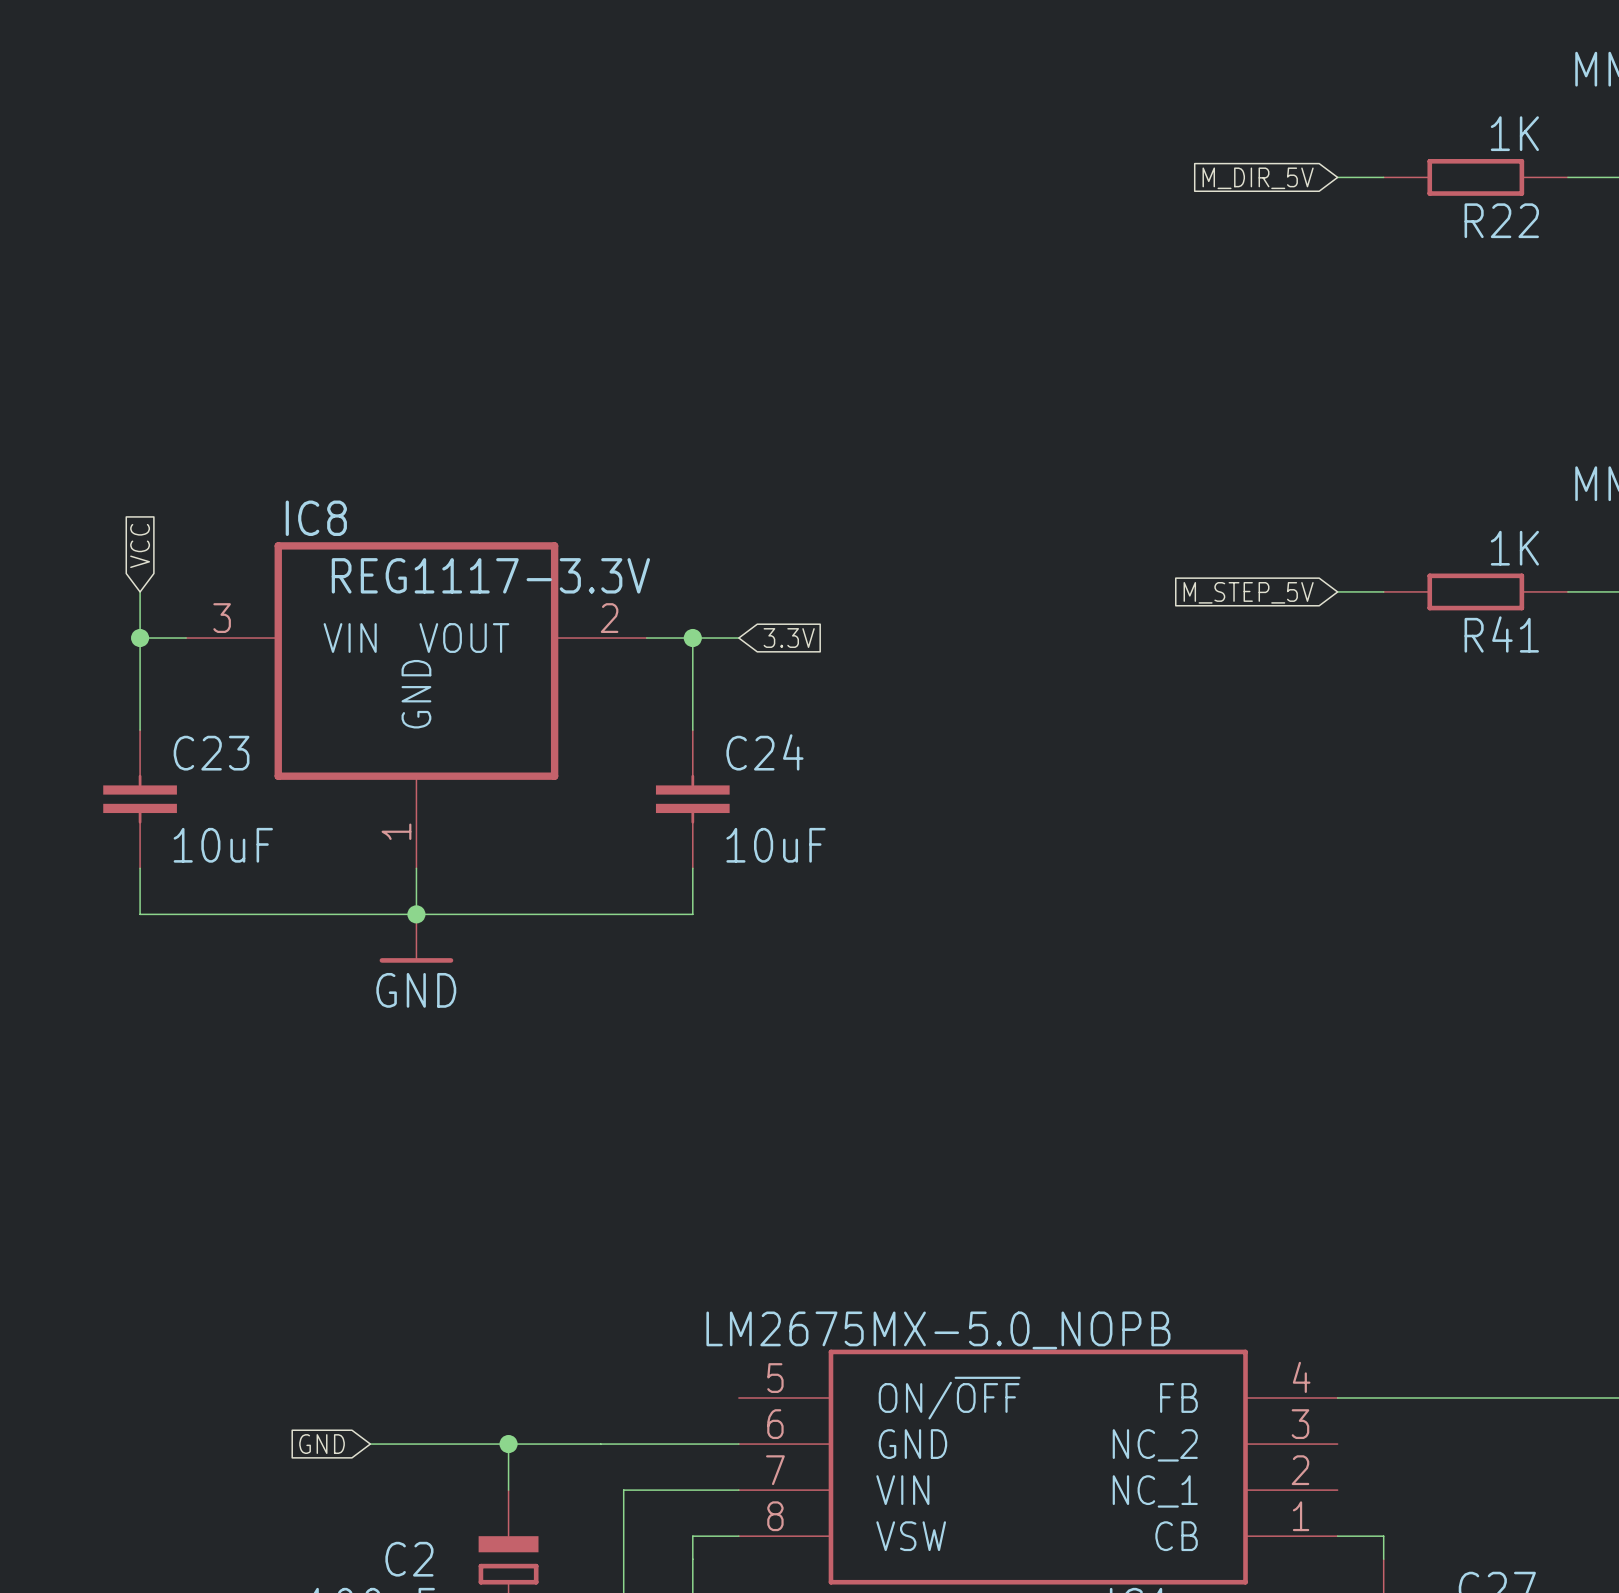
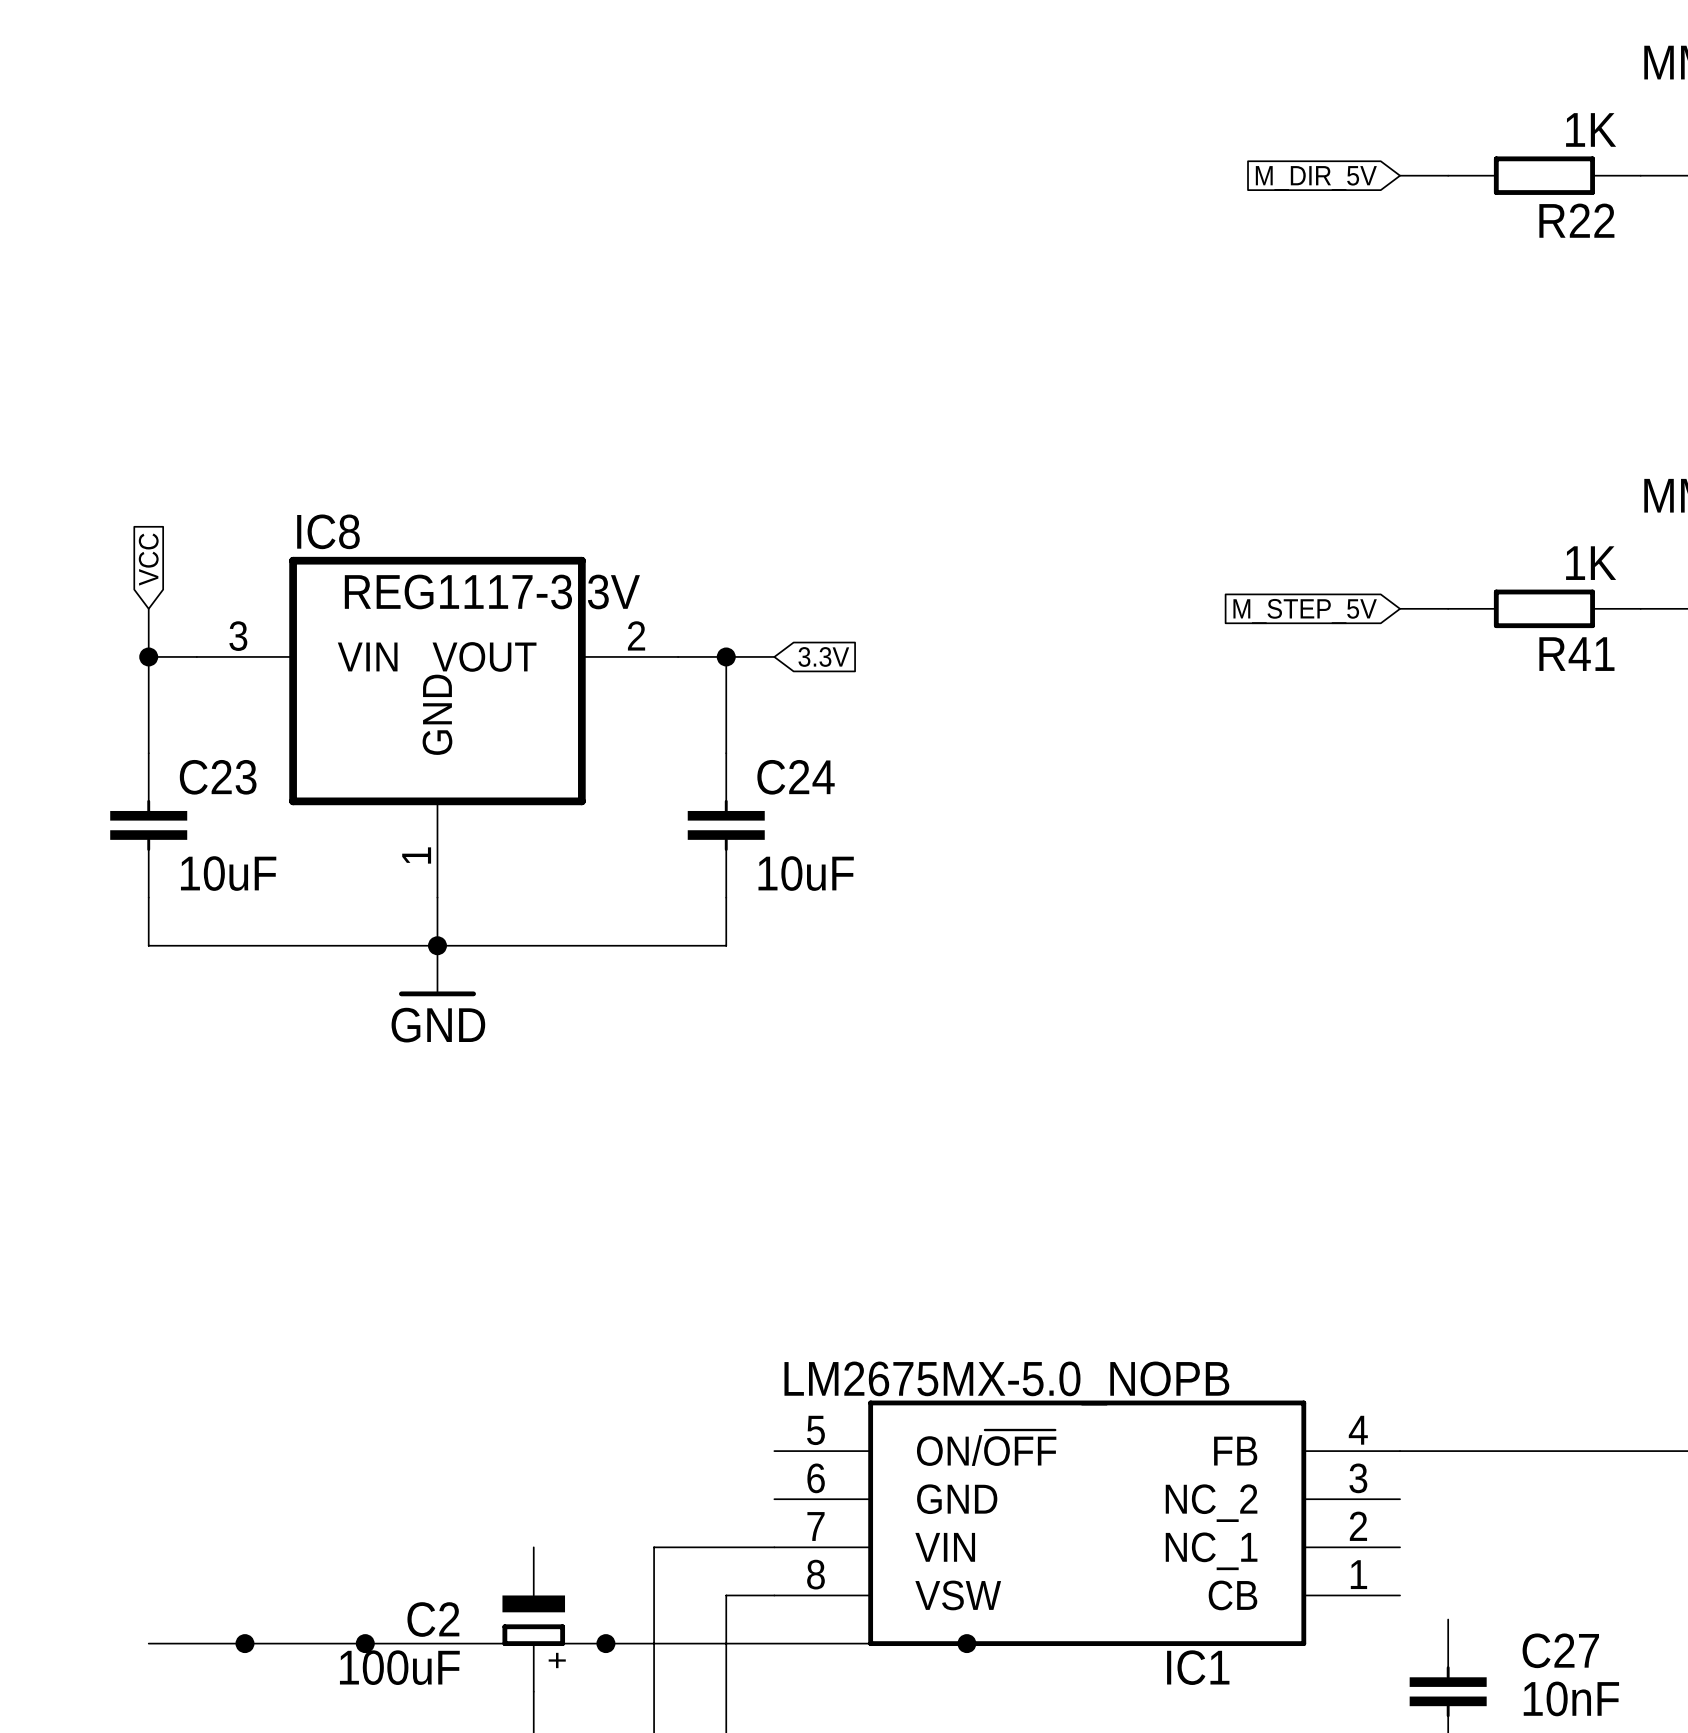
global label: GND (322, 1444) -> none
wire: (370, 1444) (738, 1444) -> none
wire: (508, 1444) (508, 1490) -> none
junction: (508, 1444) -> none
wire: (1337, 1536) (1383, 1536) (1383, 1559) -> none
wire: none -> (148, 1643) (1015, 1643)
junction: none -> (244, 1643)
junction: none -> (365, 1643)
junction: none -> (605, 1643)
junction: none -> (966, 1643)

